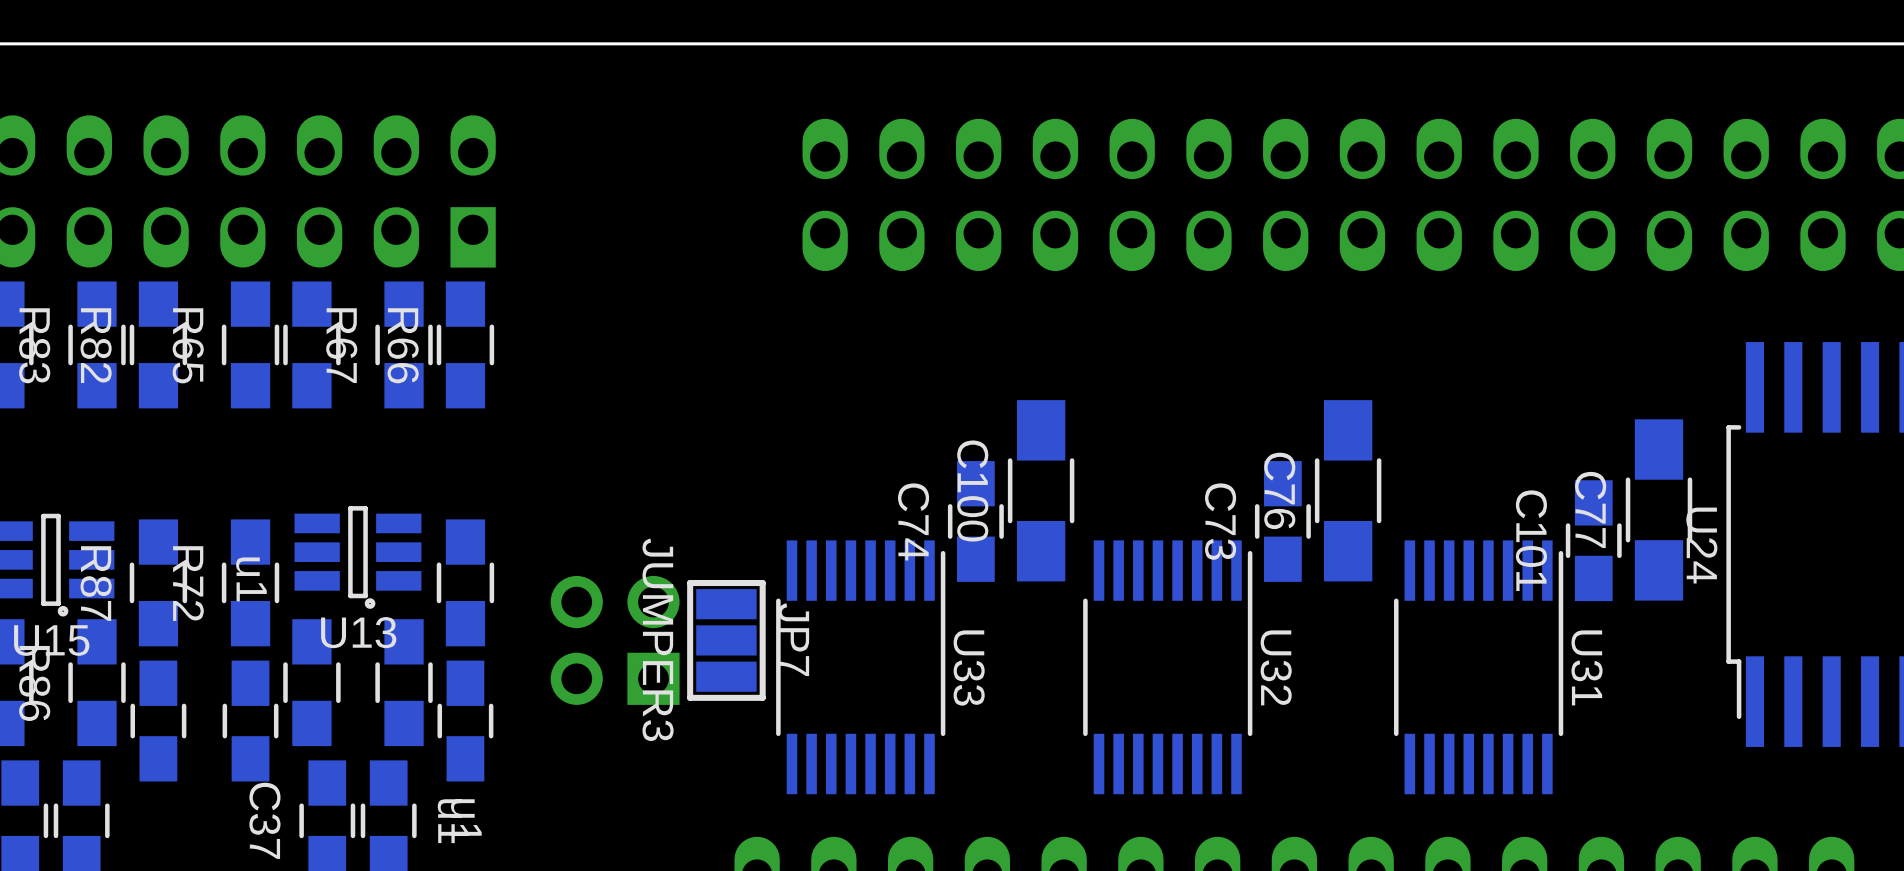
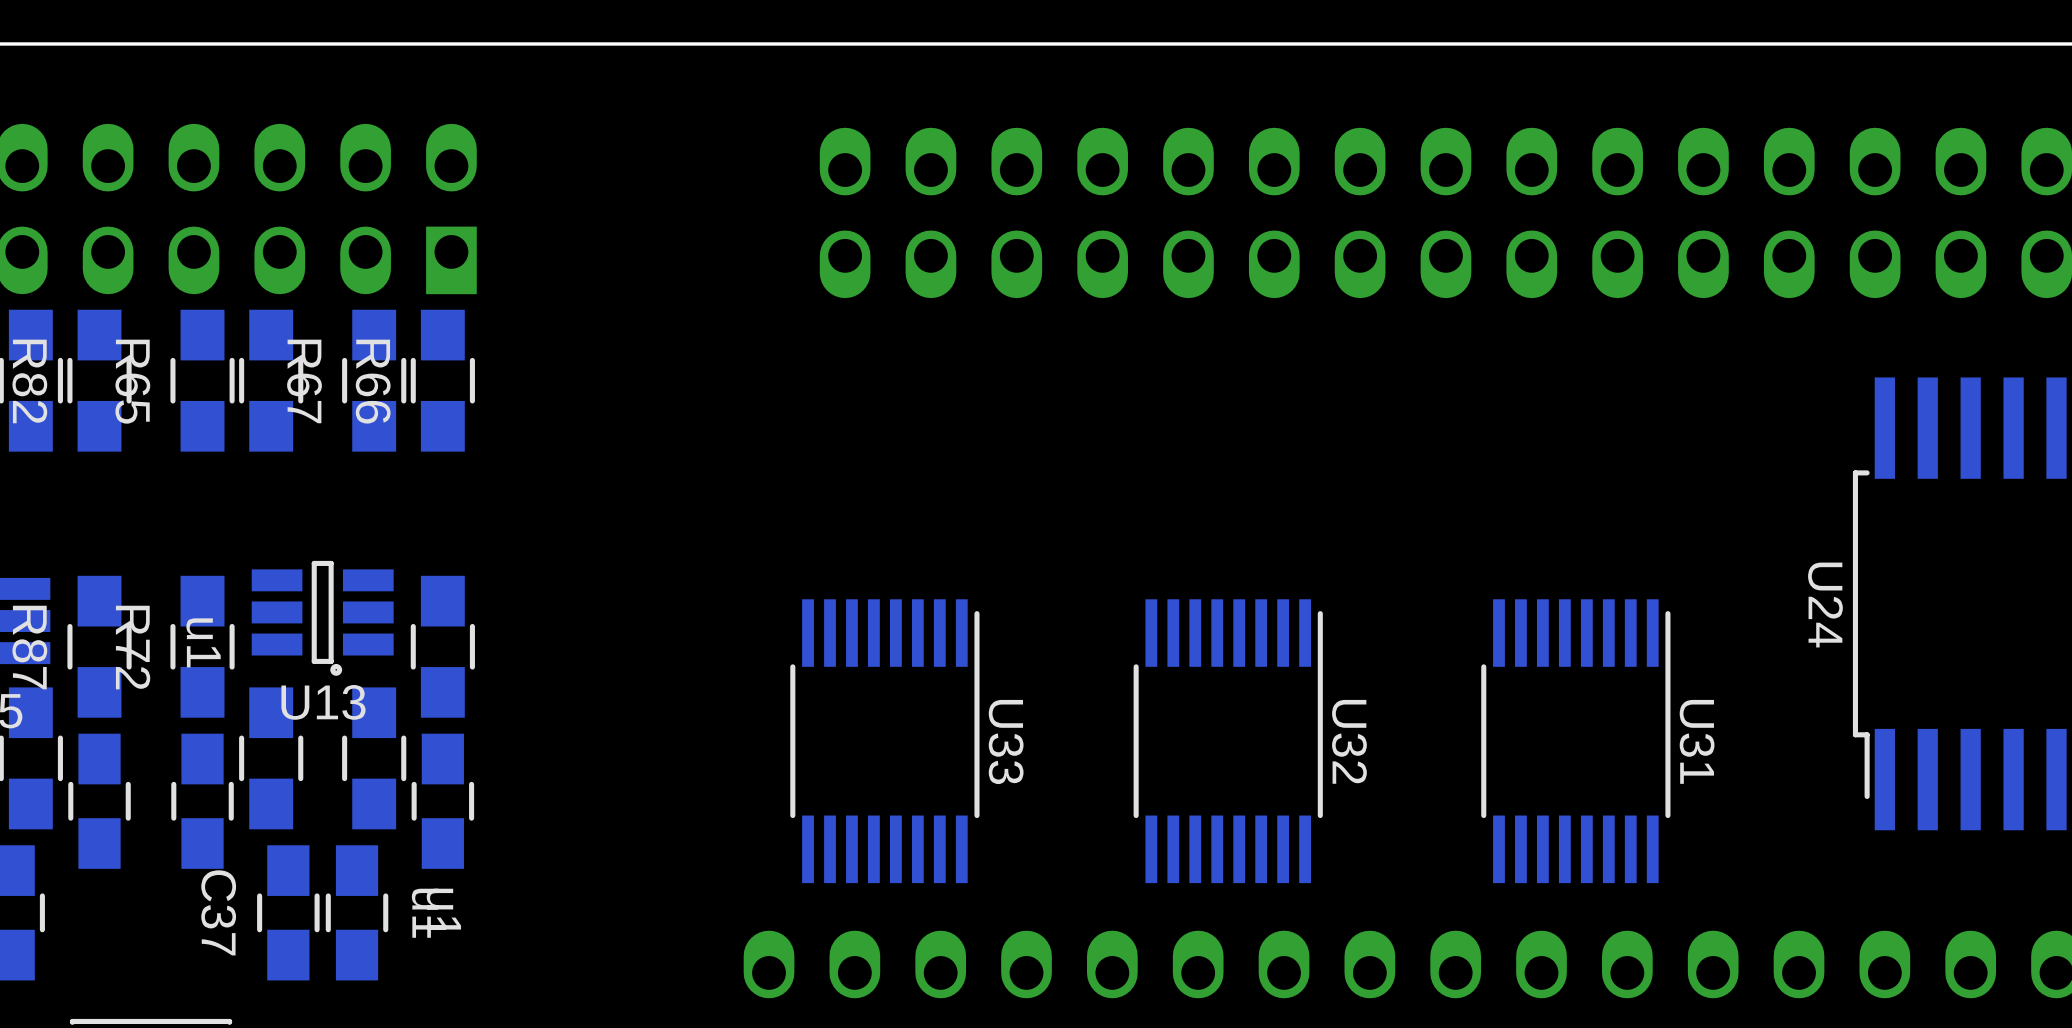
C100: (1041, 490) -> none
C76: (1348, 490) -> none
C77: (1658, 509) -> none
C74: (975, 521) -> none
C73: (1282, 521) -> none
C101: (1593, 540) -> none
part: (615, 640) -> none
JP7: JUMPER3 (726, 640) -> none

